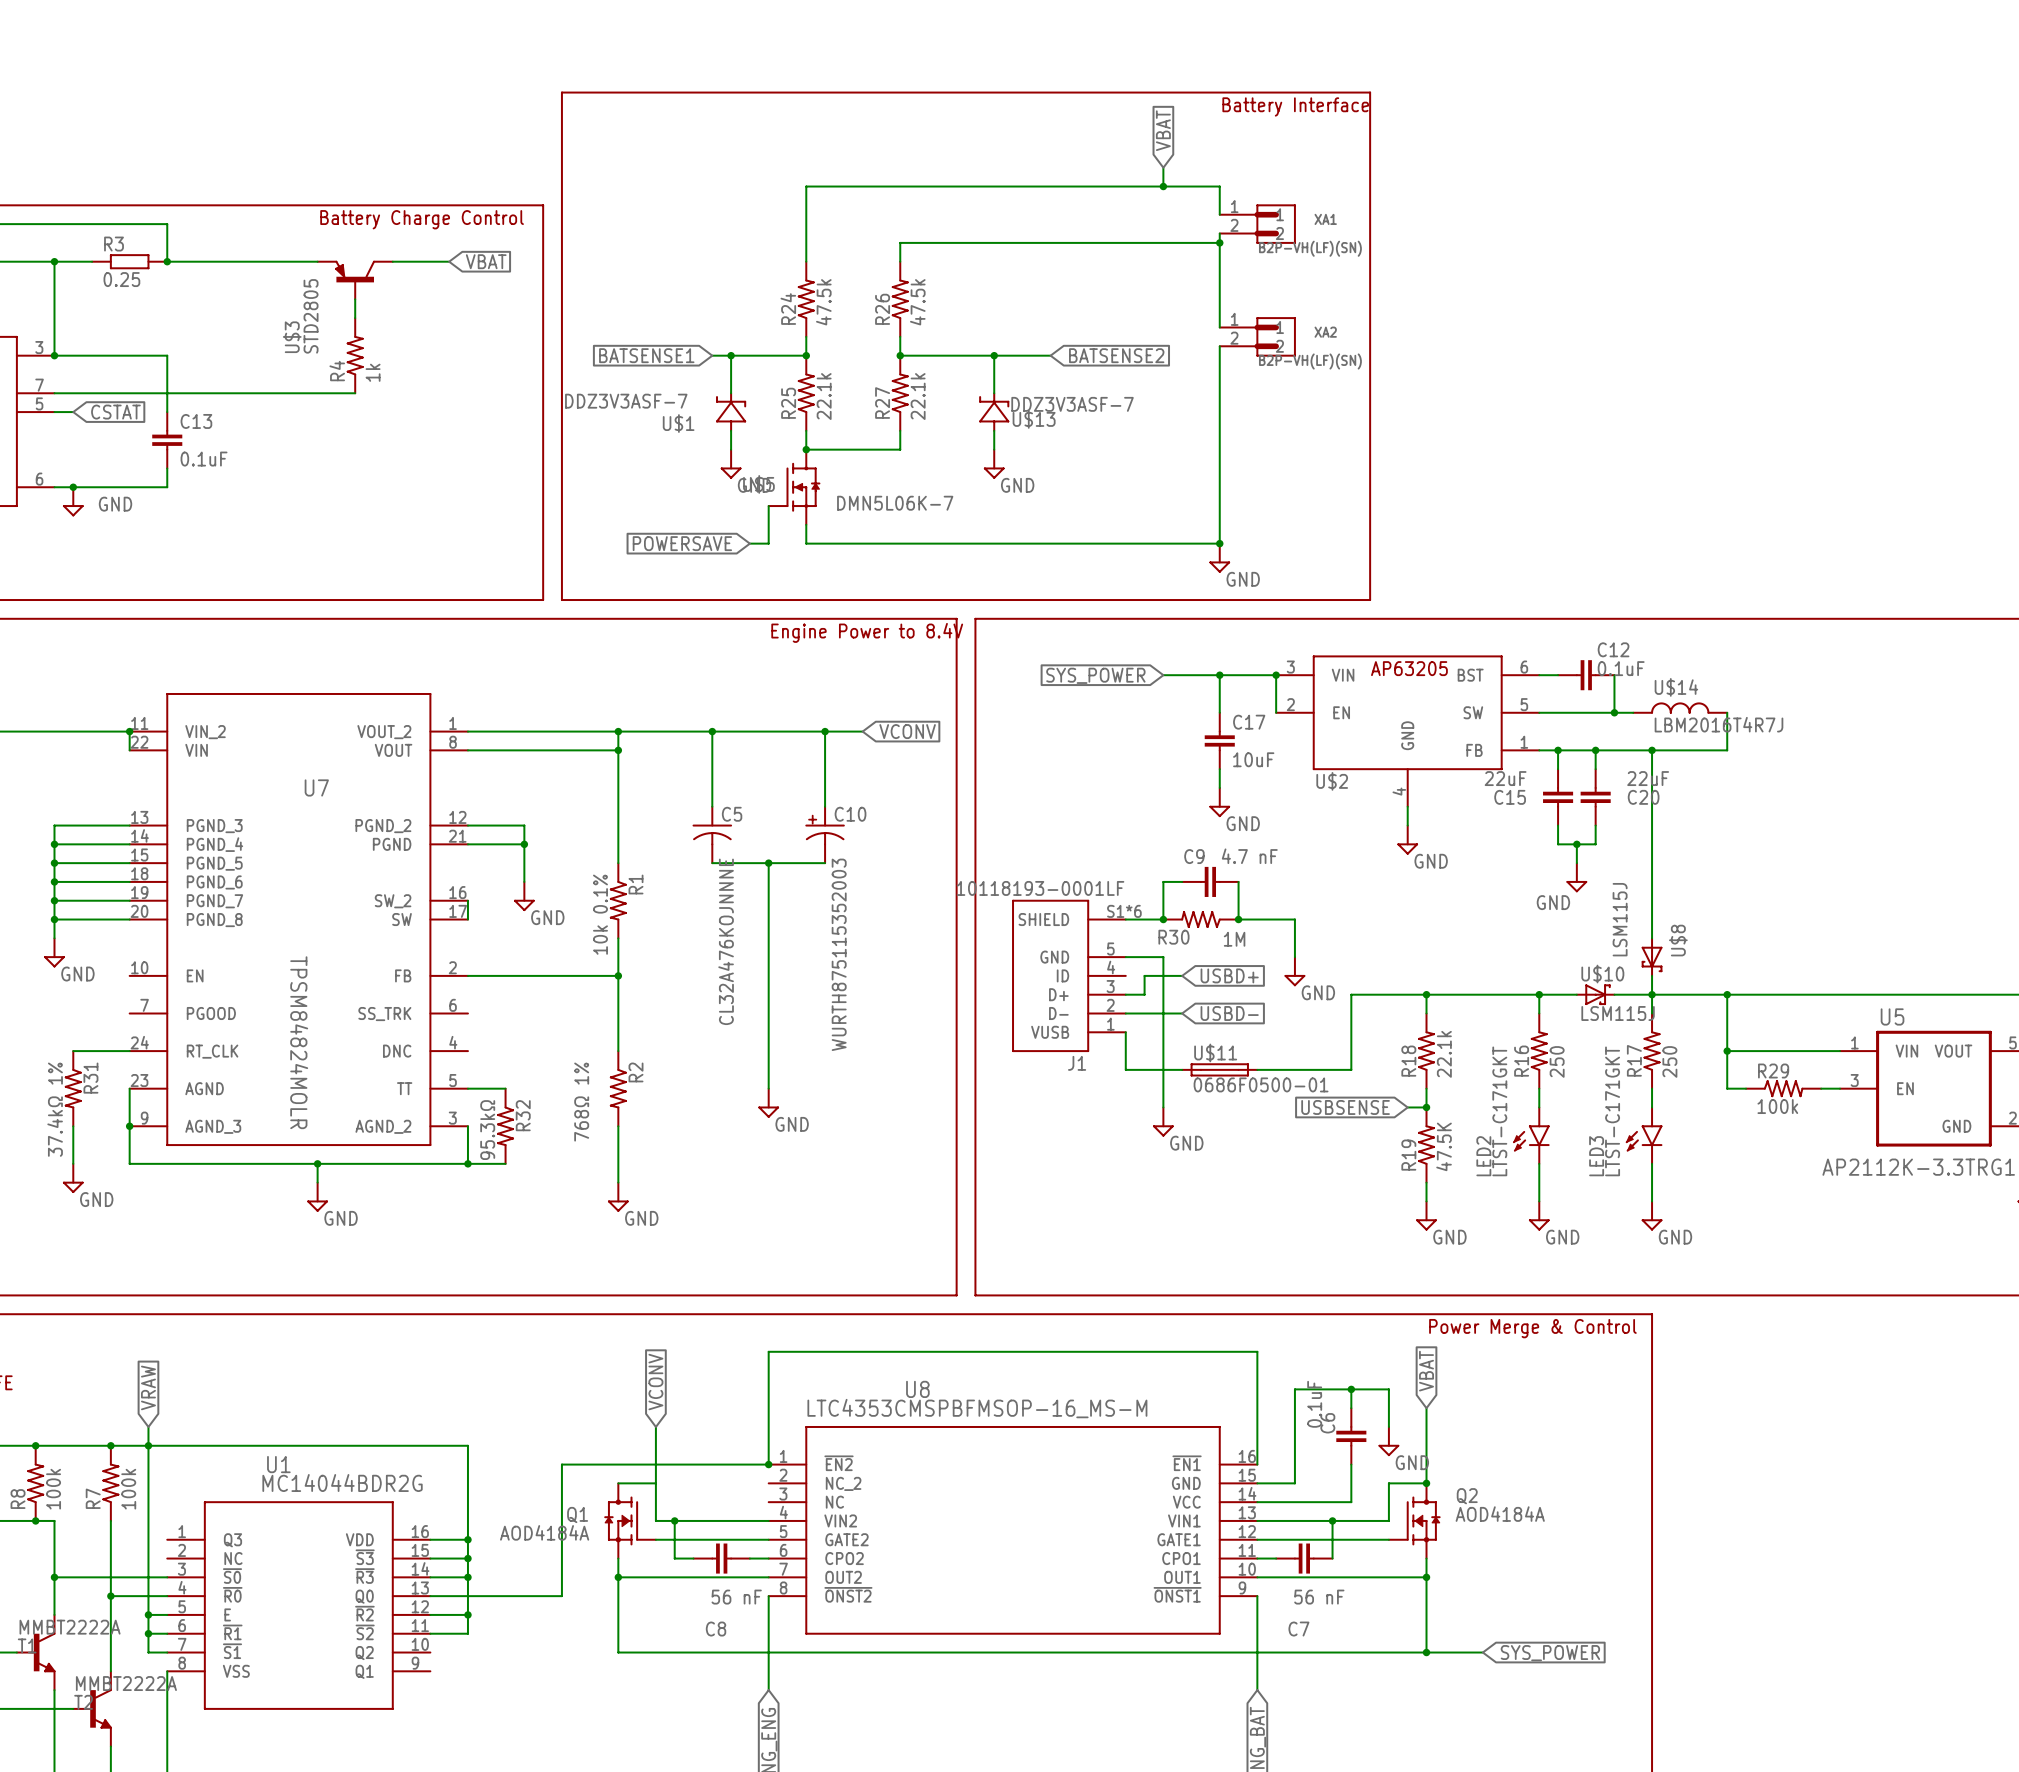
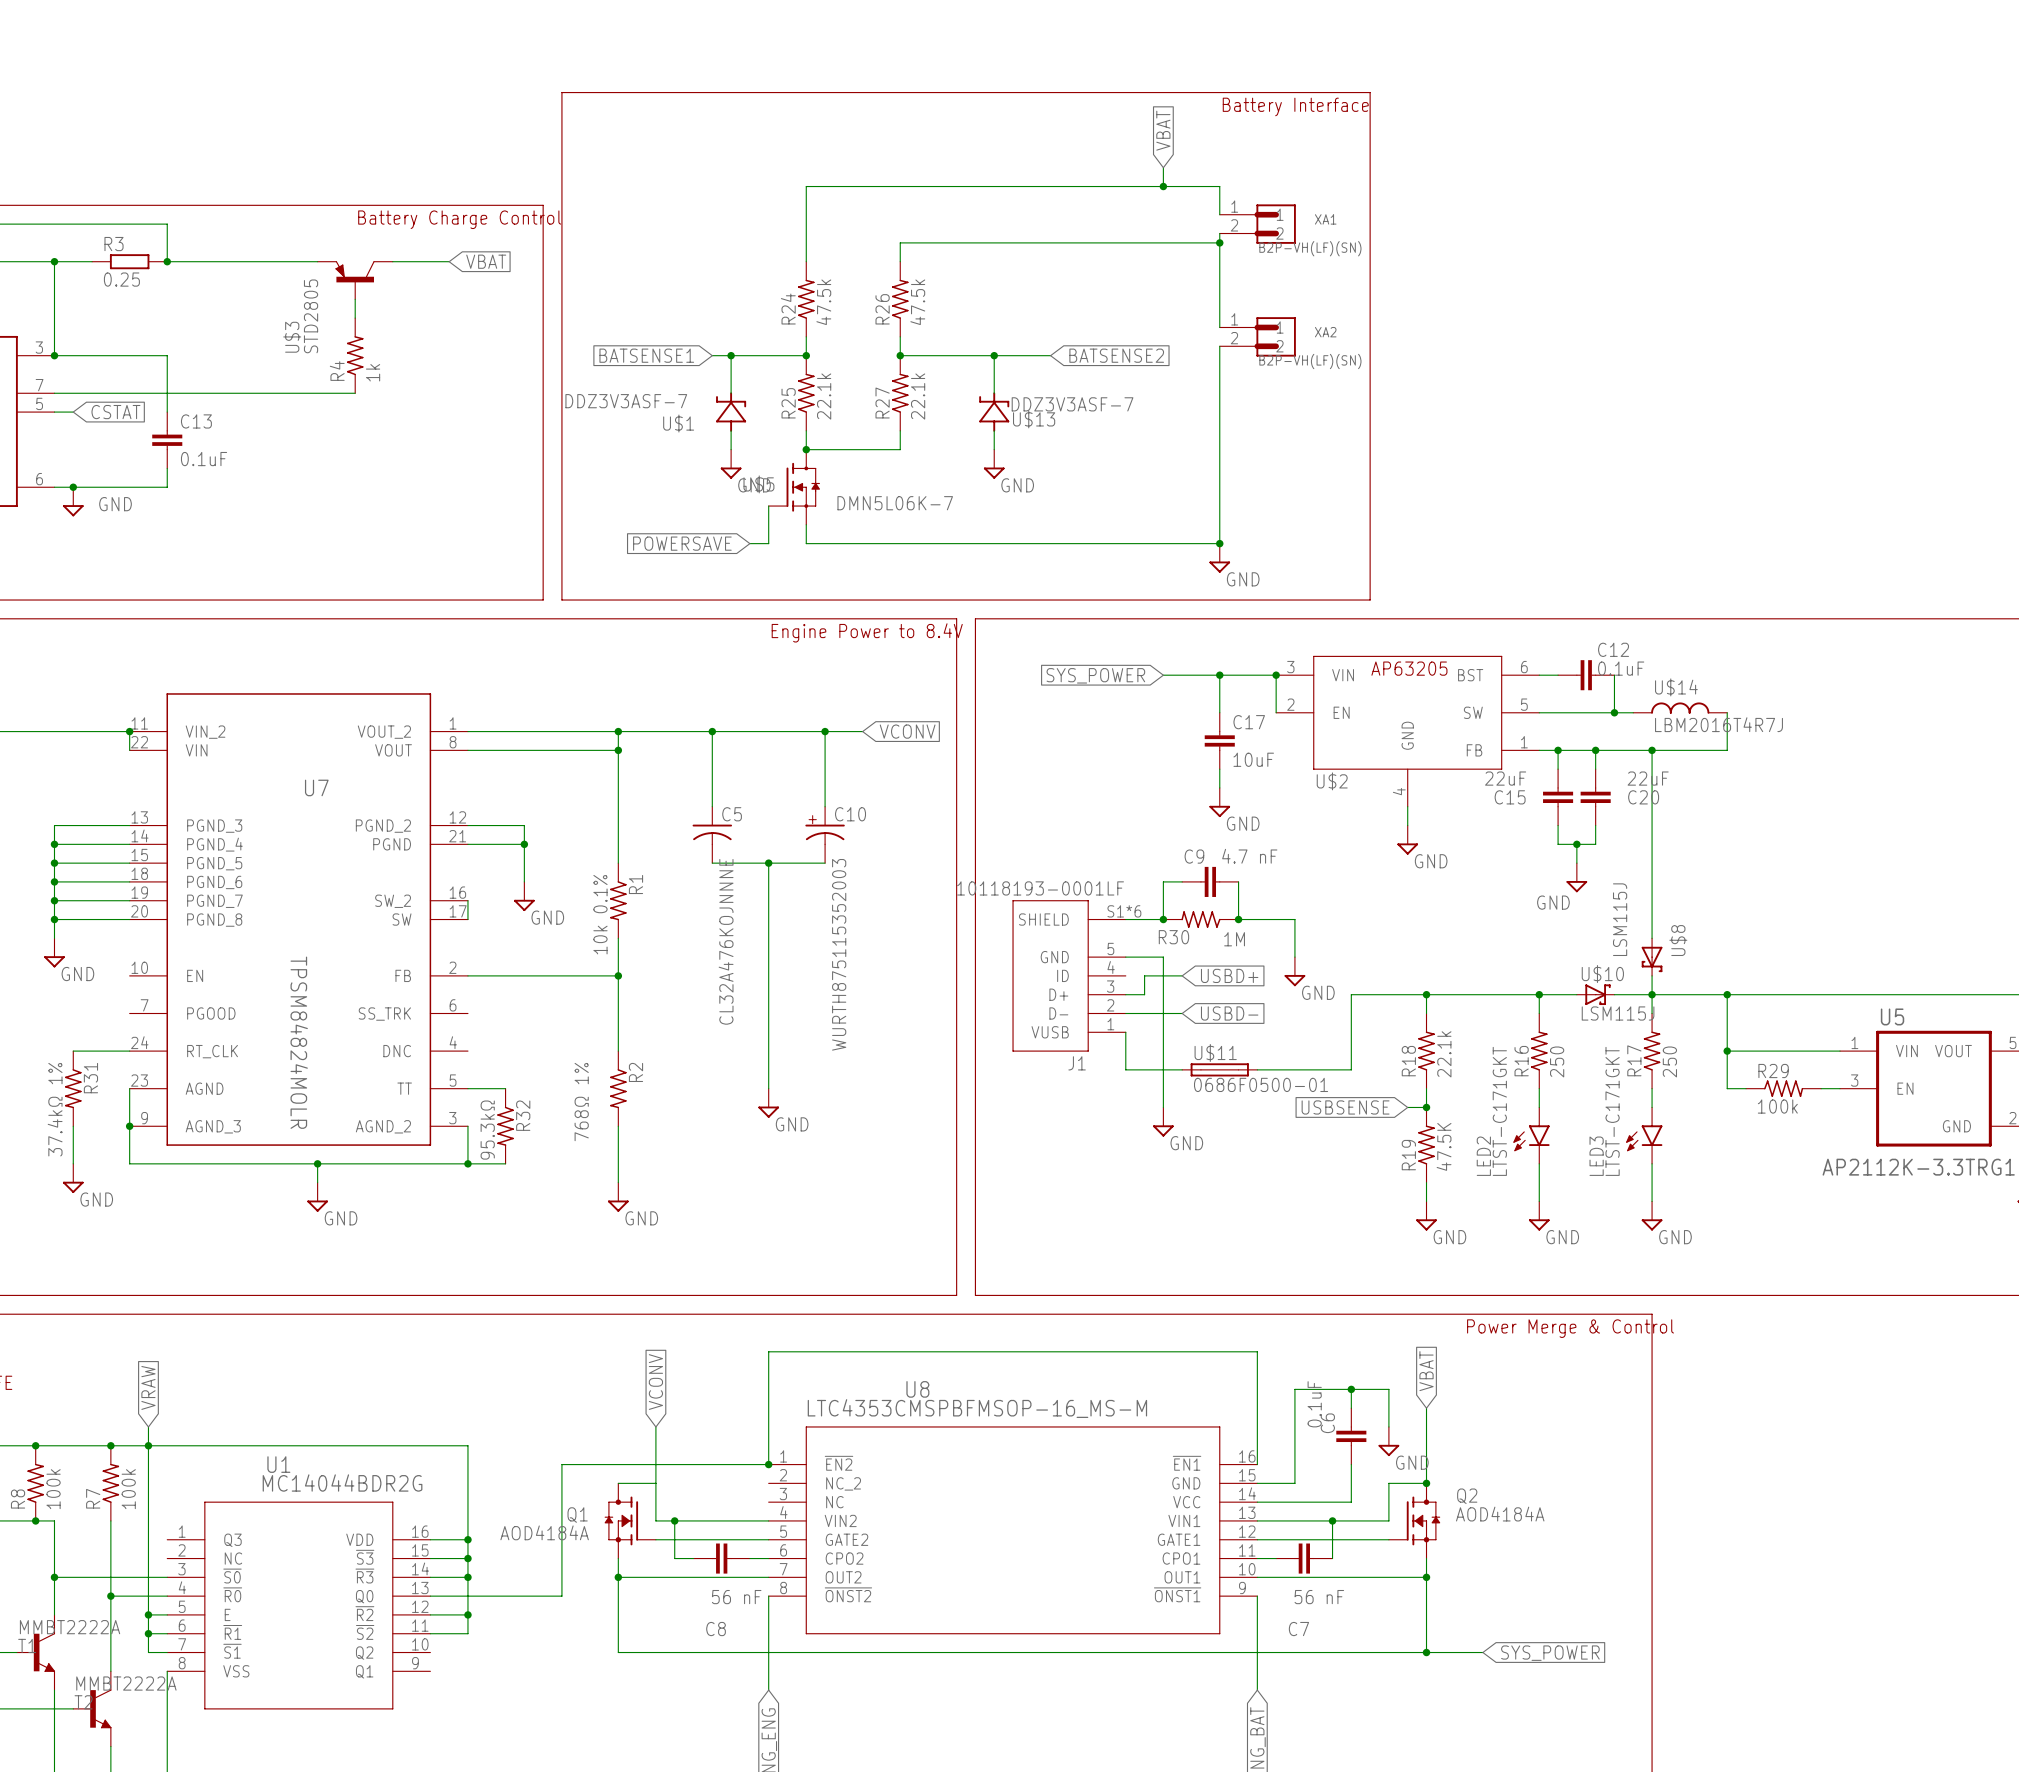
text position: Battery Charge Control (422, 219) -> Battery Charge Control (459, 219)
text position: Power Merge & Control (1532, 1328) -> Power Merge & Control (1570, 1328)

